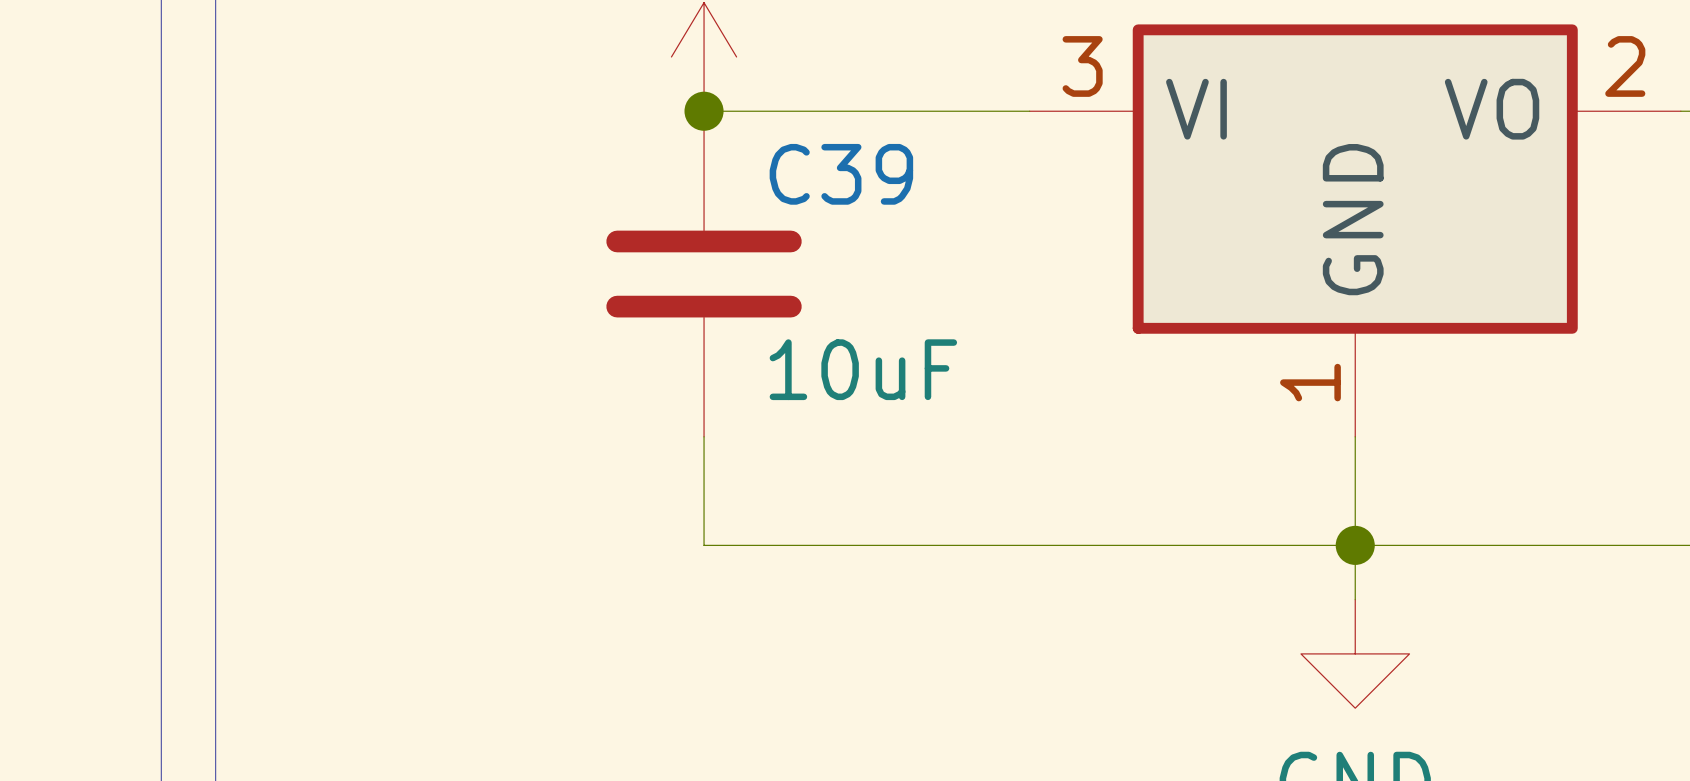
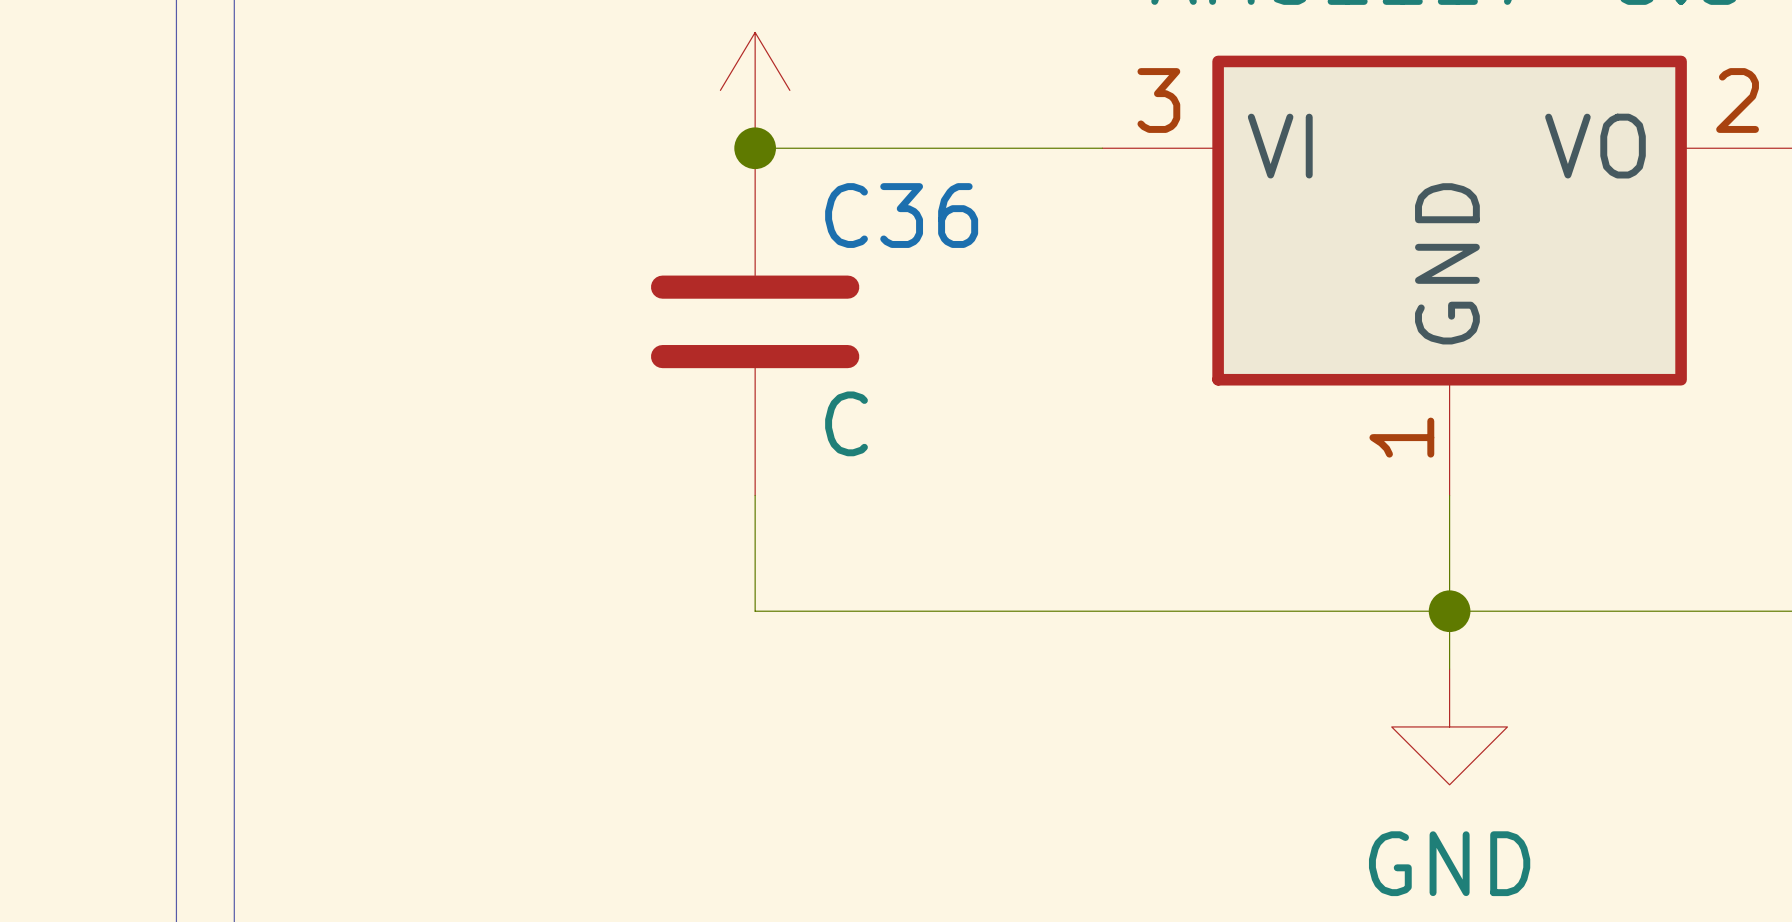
C39 name: C39 (841, 174) -> C36 (901, 215)
C39 value: 10uF (863, 369) -> C (846, 423)

